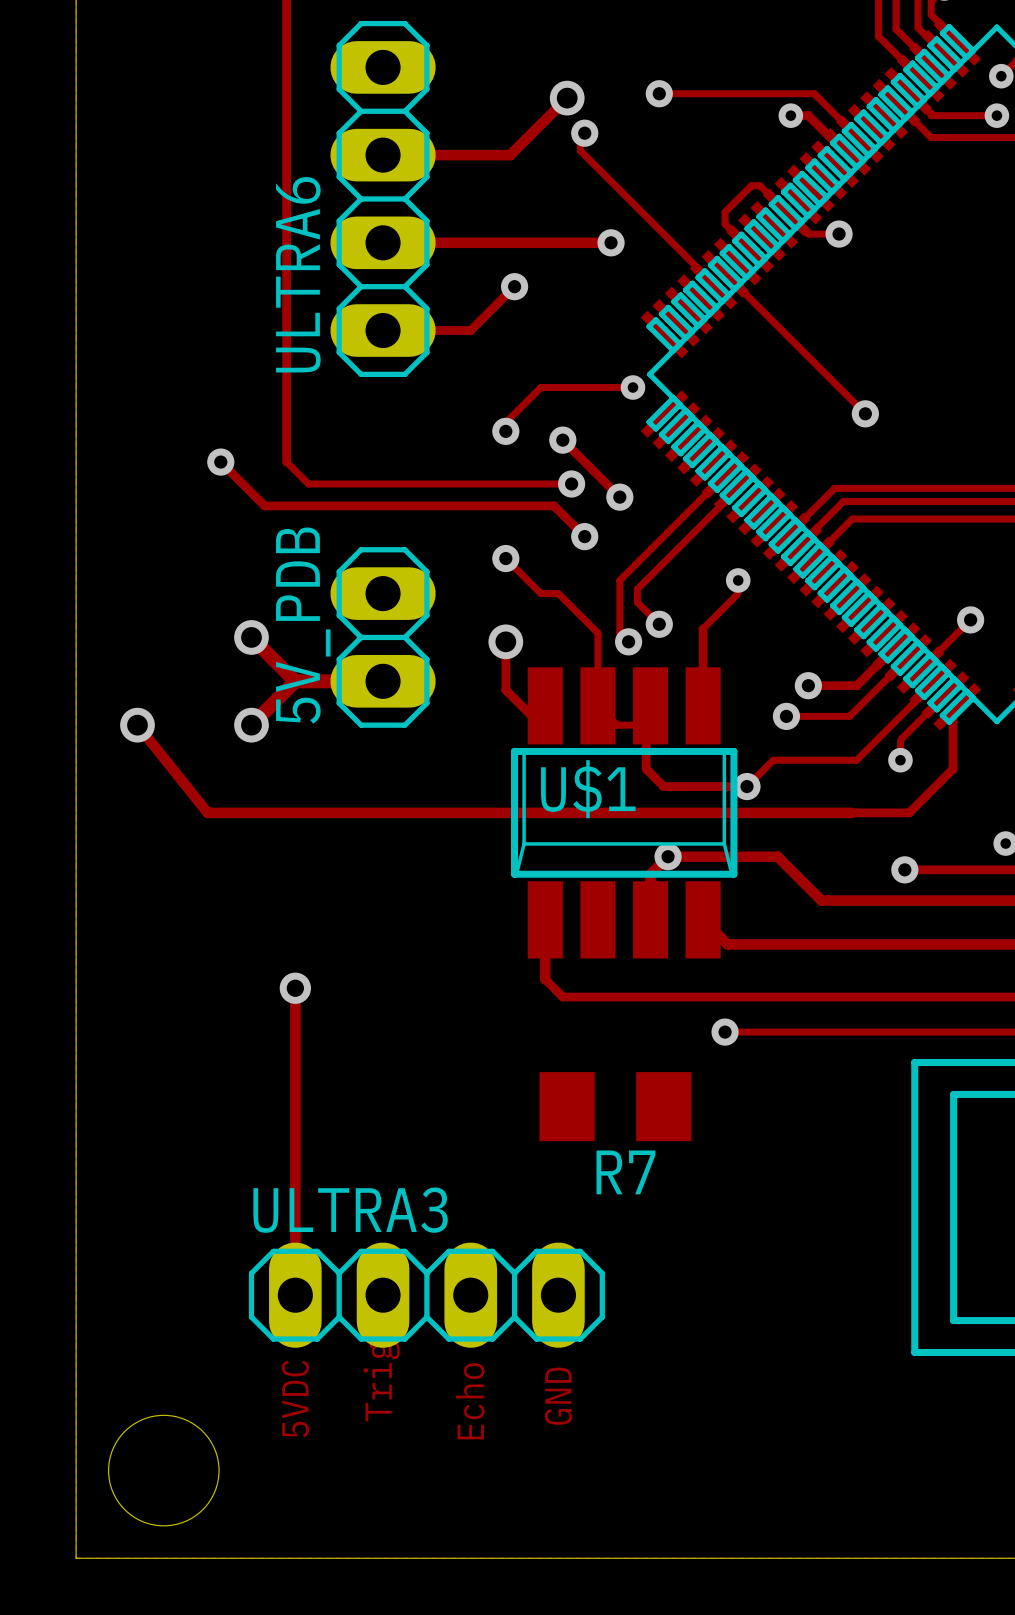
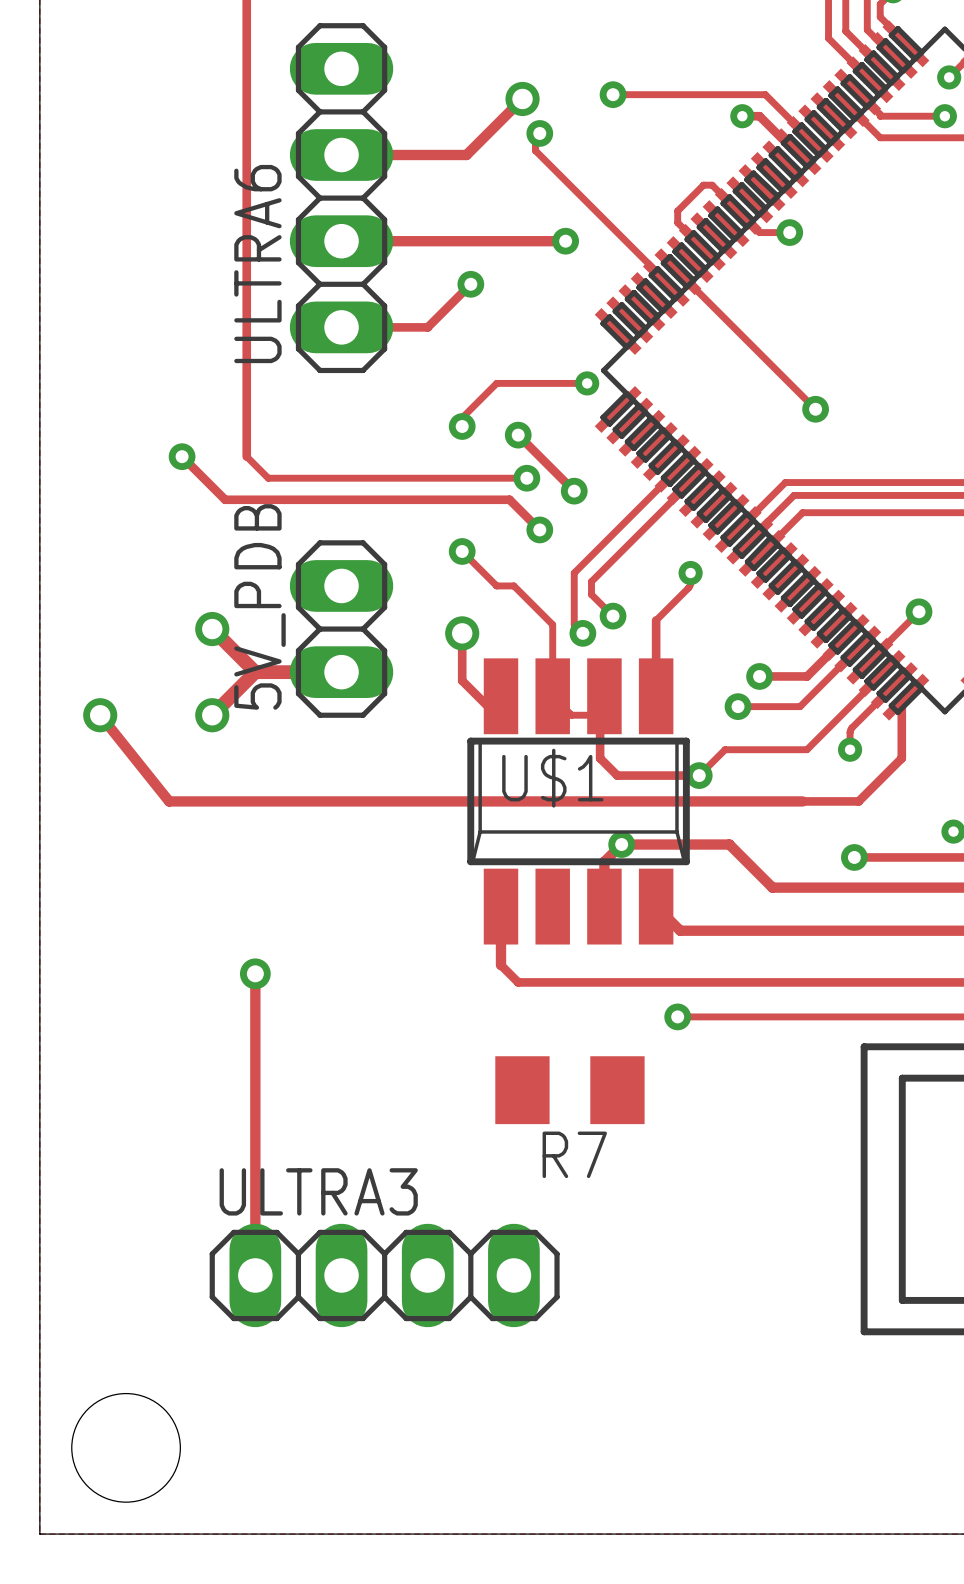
text: Trig (381, 1381) -> none
text: GND (558, 1396) -> none
text: 5VDC (295, 1398) -> none
text: Echo (470, 1401) -> none

